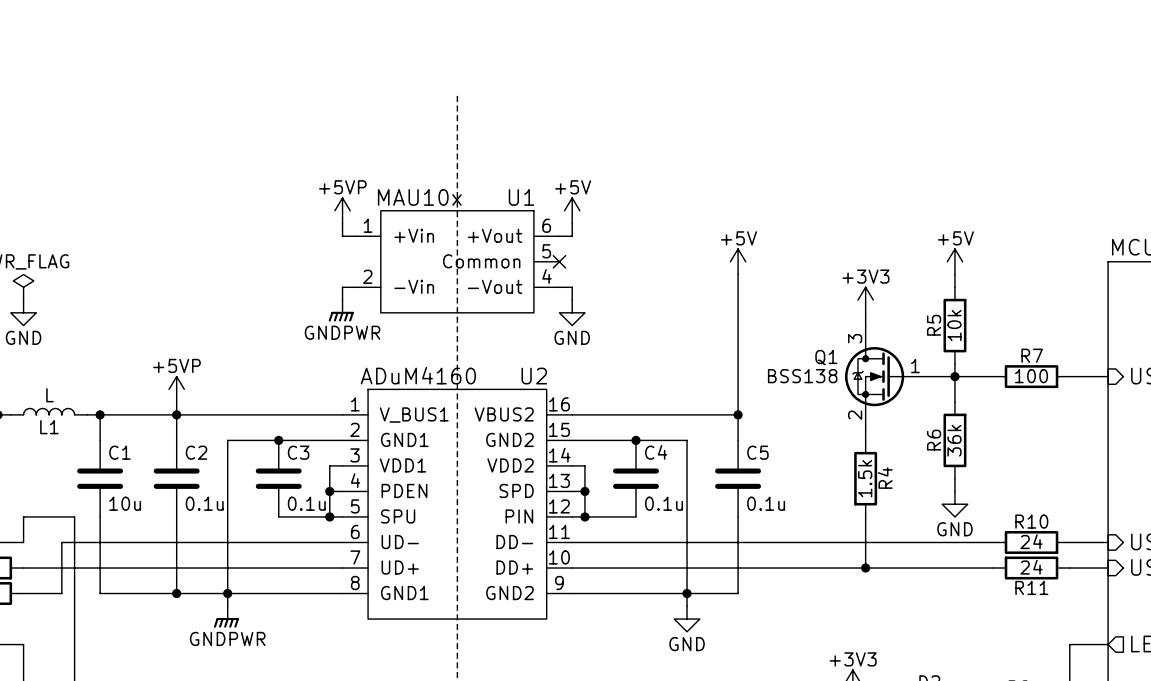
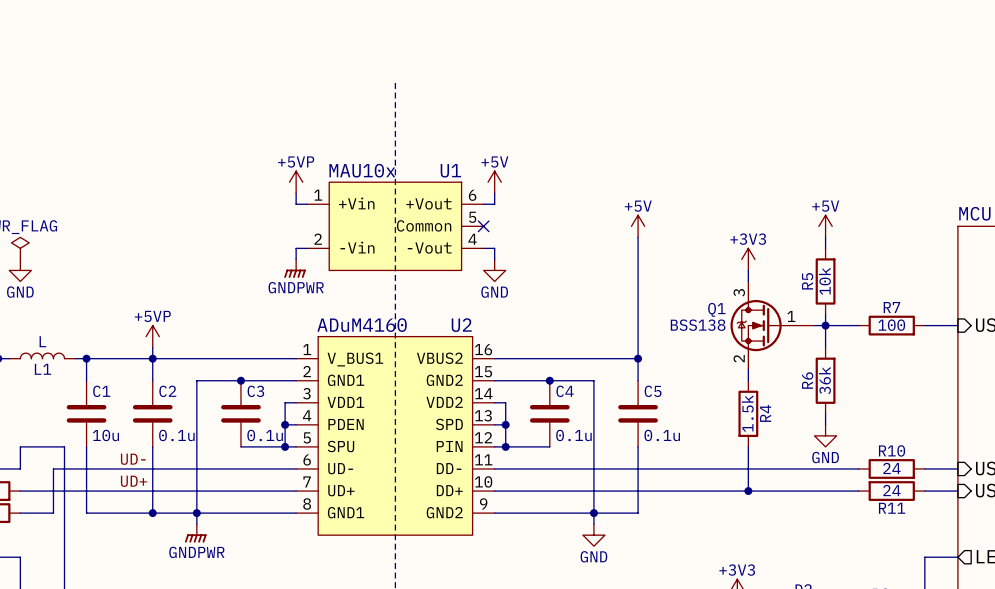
label: none -> UD- (133, 459)
label: none -> UD+ (134, 481)

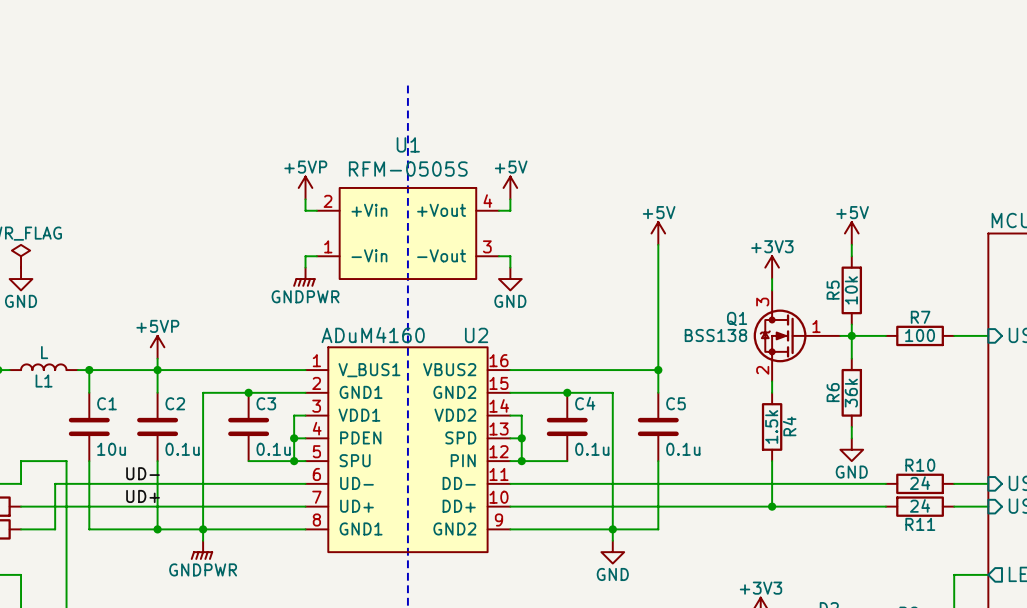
U1 value: MAU10x (362, 170) -> RFM-0505S (408, 169)
U1 name position: U1 (450, 170) -> U1 (408, 144)
U1 symbol: [307, 182, 484, 271] -> [316, 187, 499, 280]
no-connect mark: (483, 226) -> none

